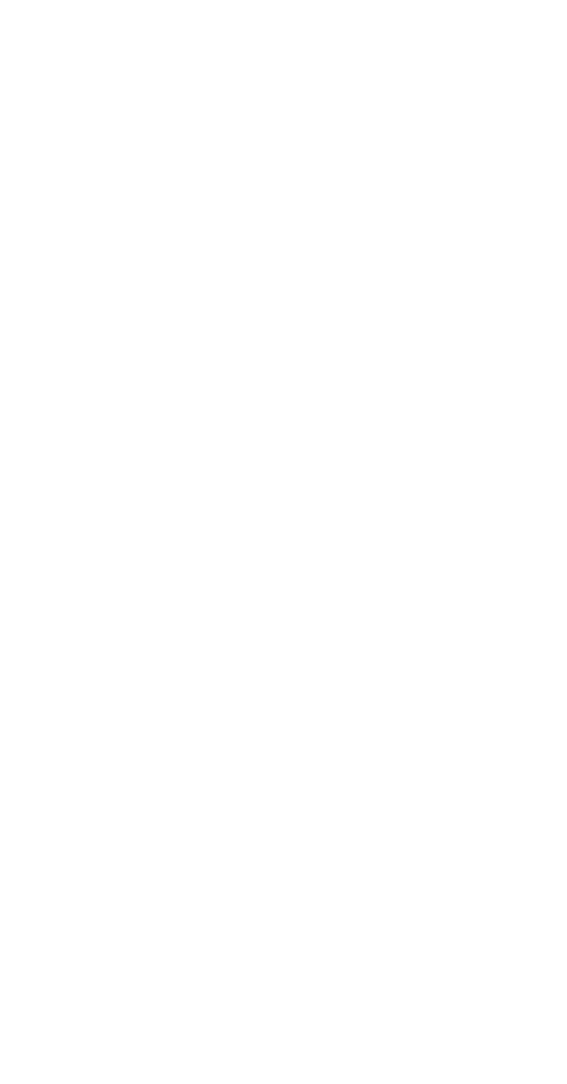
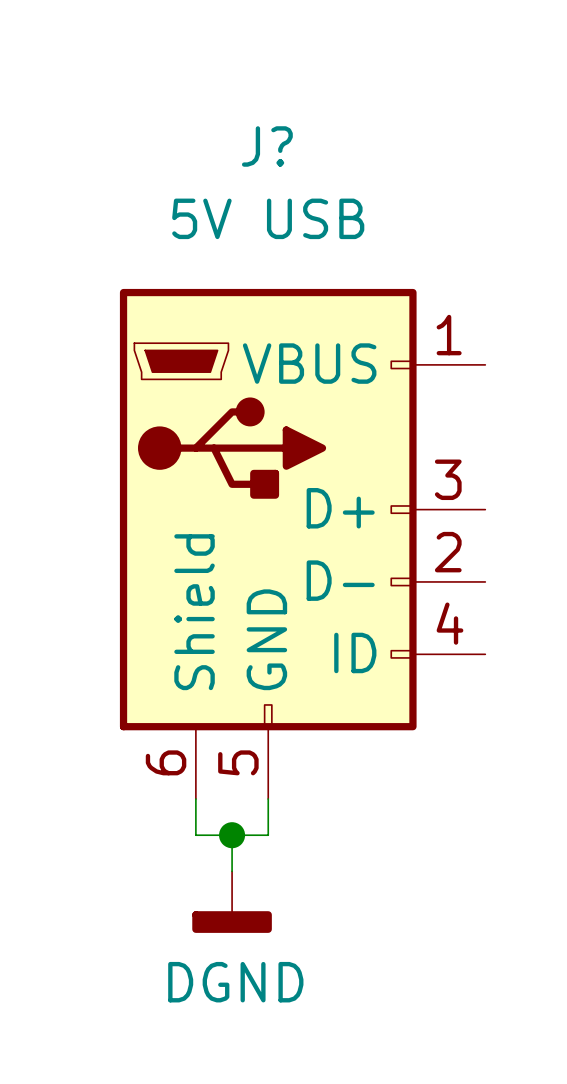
J?: none -> 5V USB (302, 543)
wire: none -> (195, 799) (195, 835) (268, 835) (268, 799)
wire: none -> (232, 835) (232, 871)
junction: none -> (232, 835)
power symbol: none -> DGND (232, 902)

